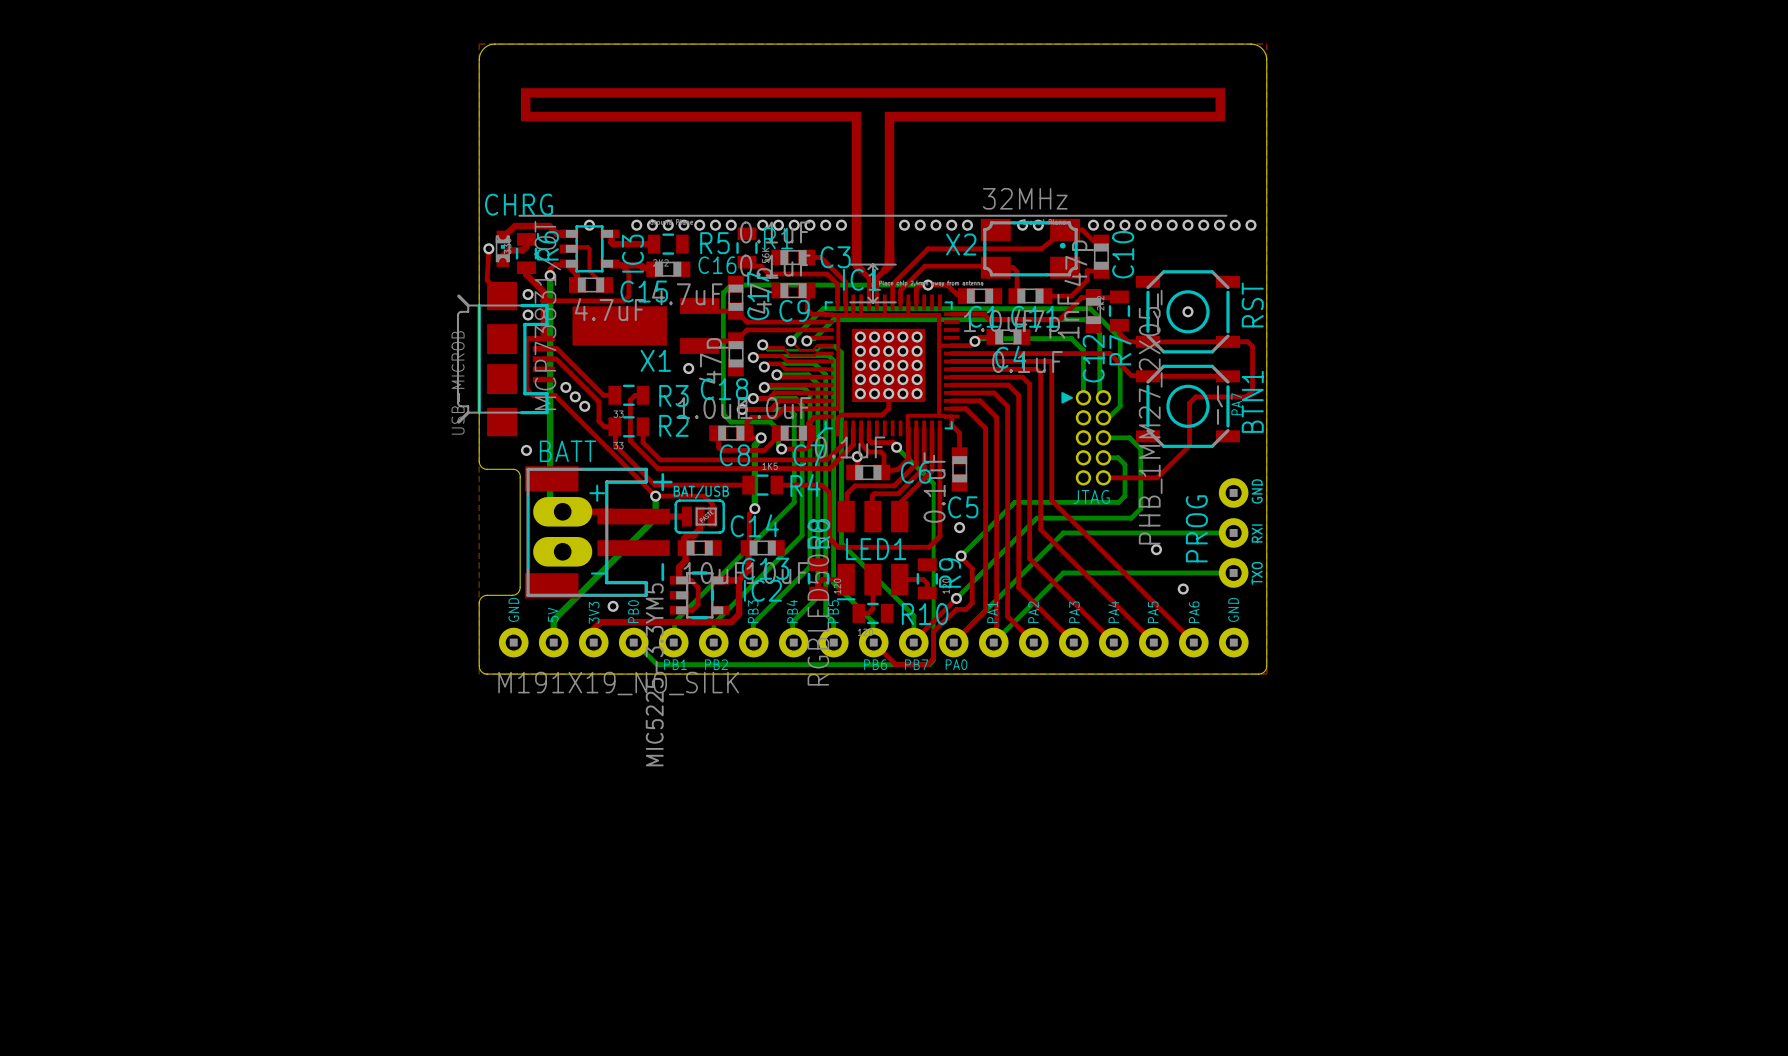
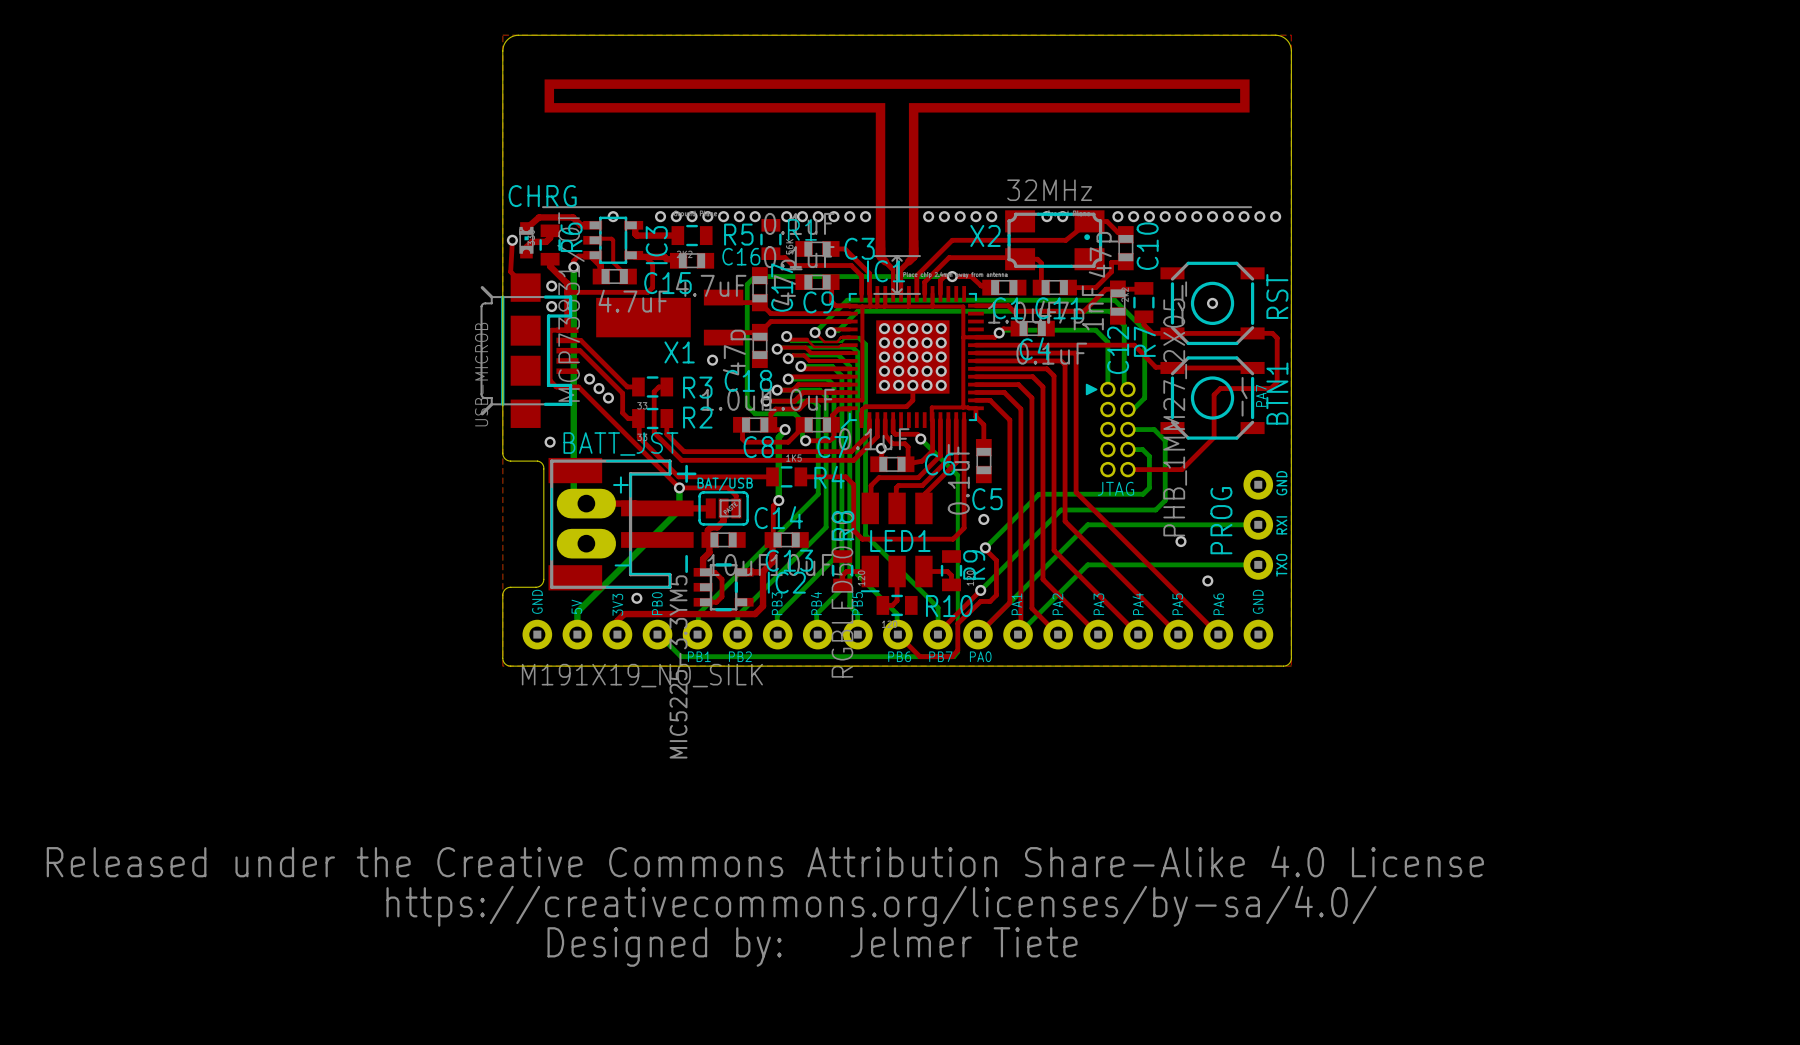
BATT name: BATT (568, 451) -> BATT_JST (620, 443)
drawing: none -> [46, 845, 1484, 967]
text: none -> Jelmer Tiete (964, 942)

